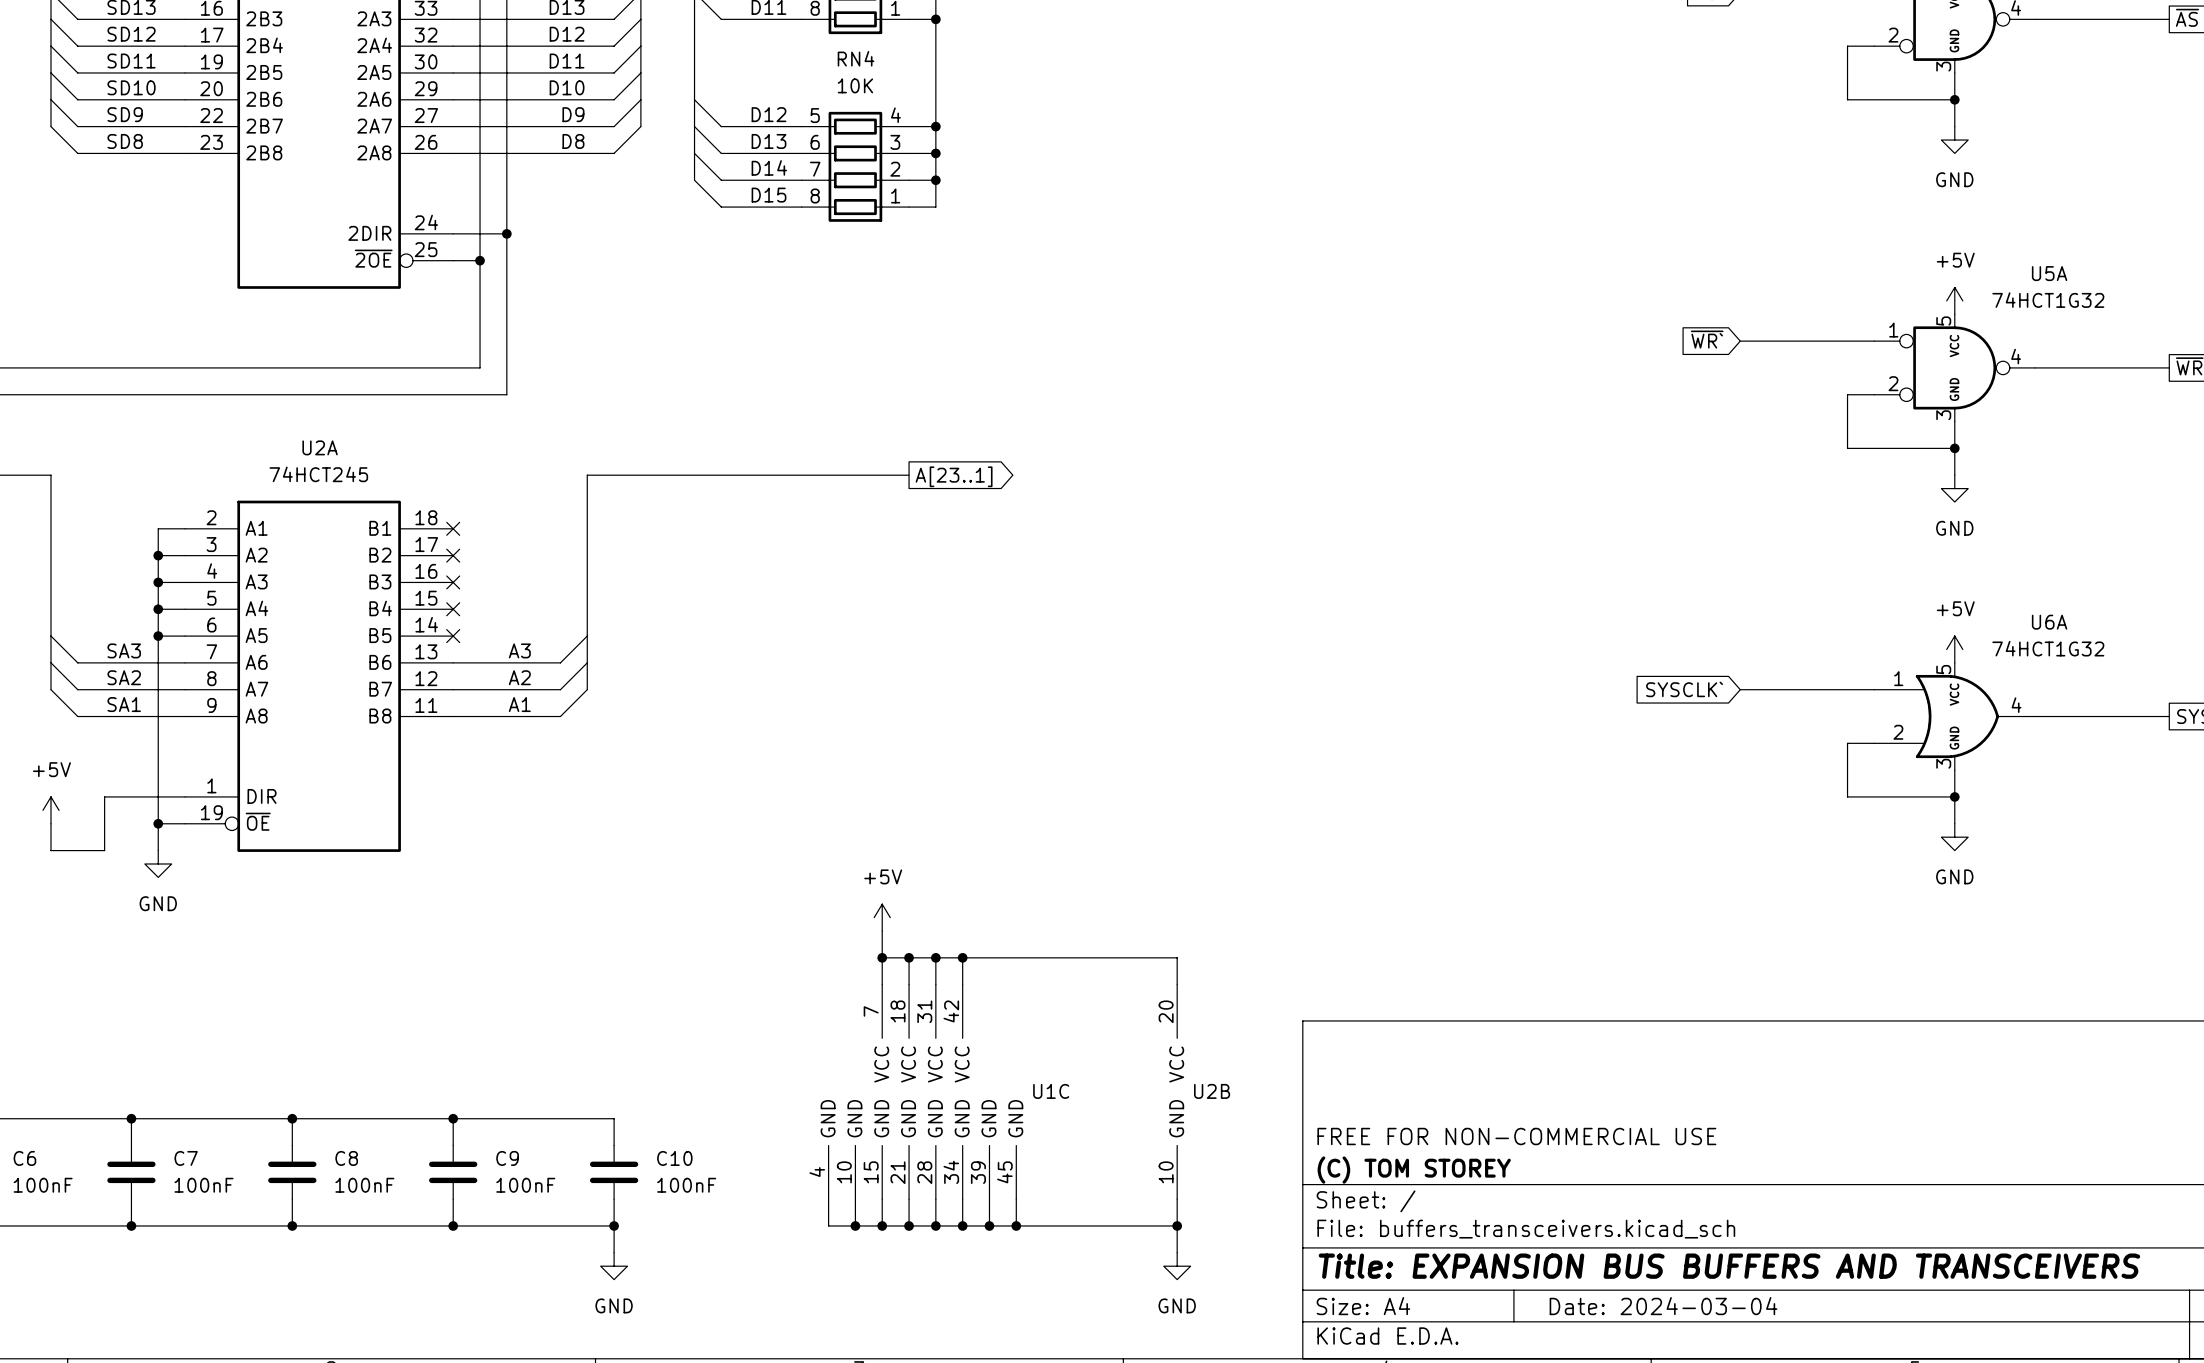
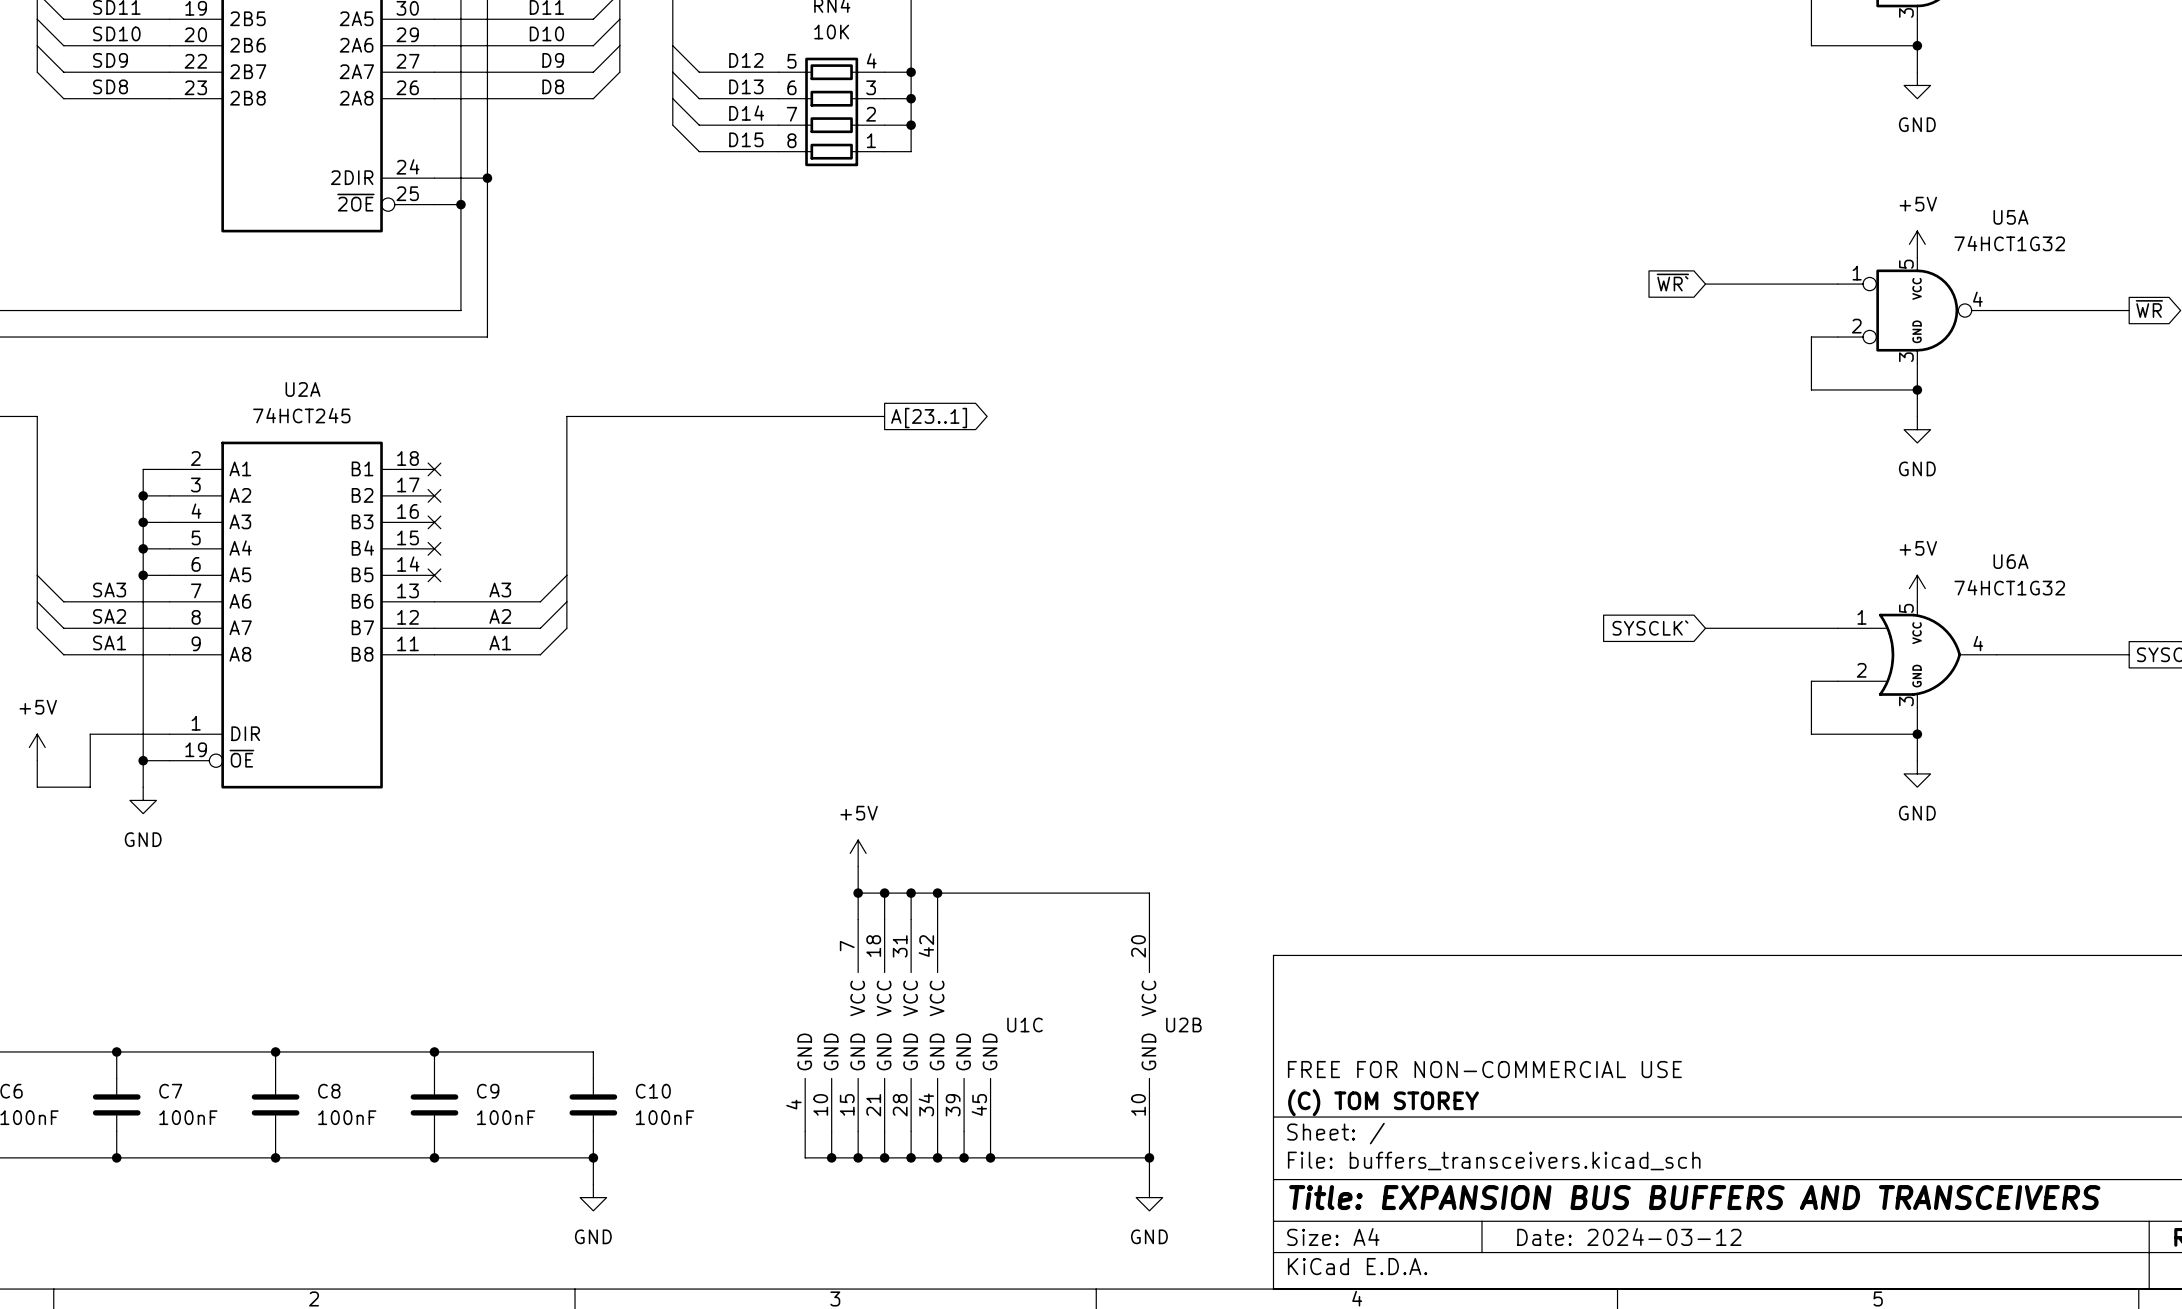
title block: Date: 2024-03-04 (1663, 1306) -> Date: 2024-03-12 (1629, 1237)

